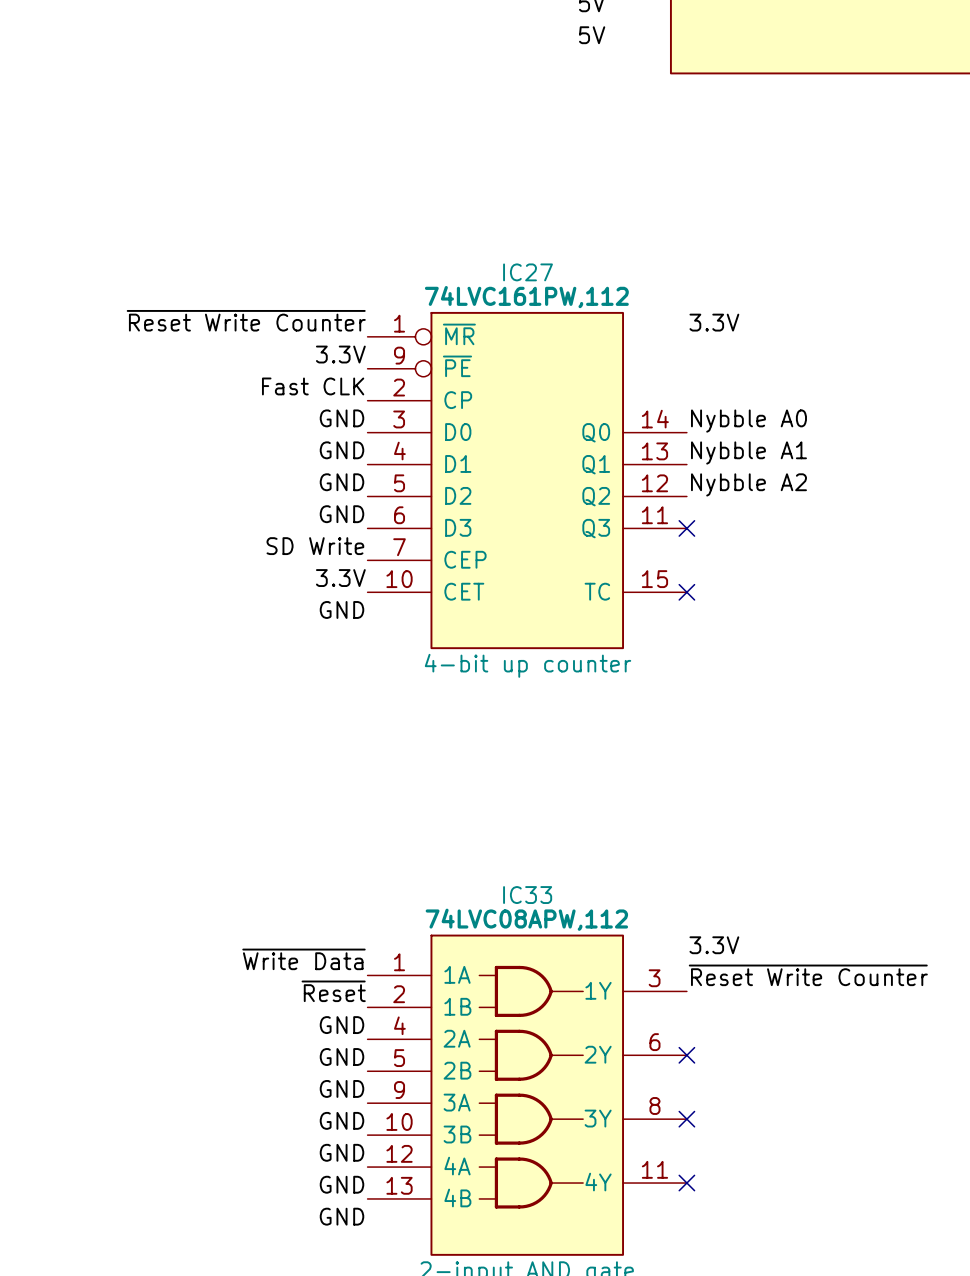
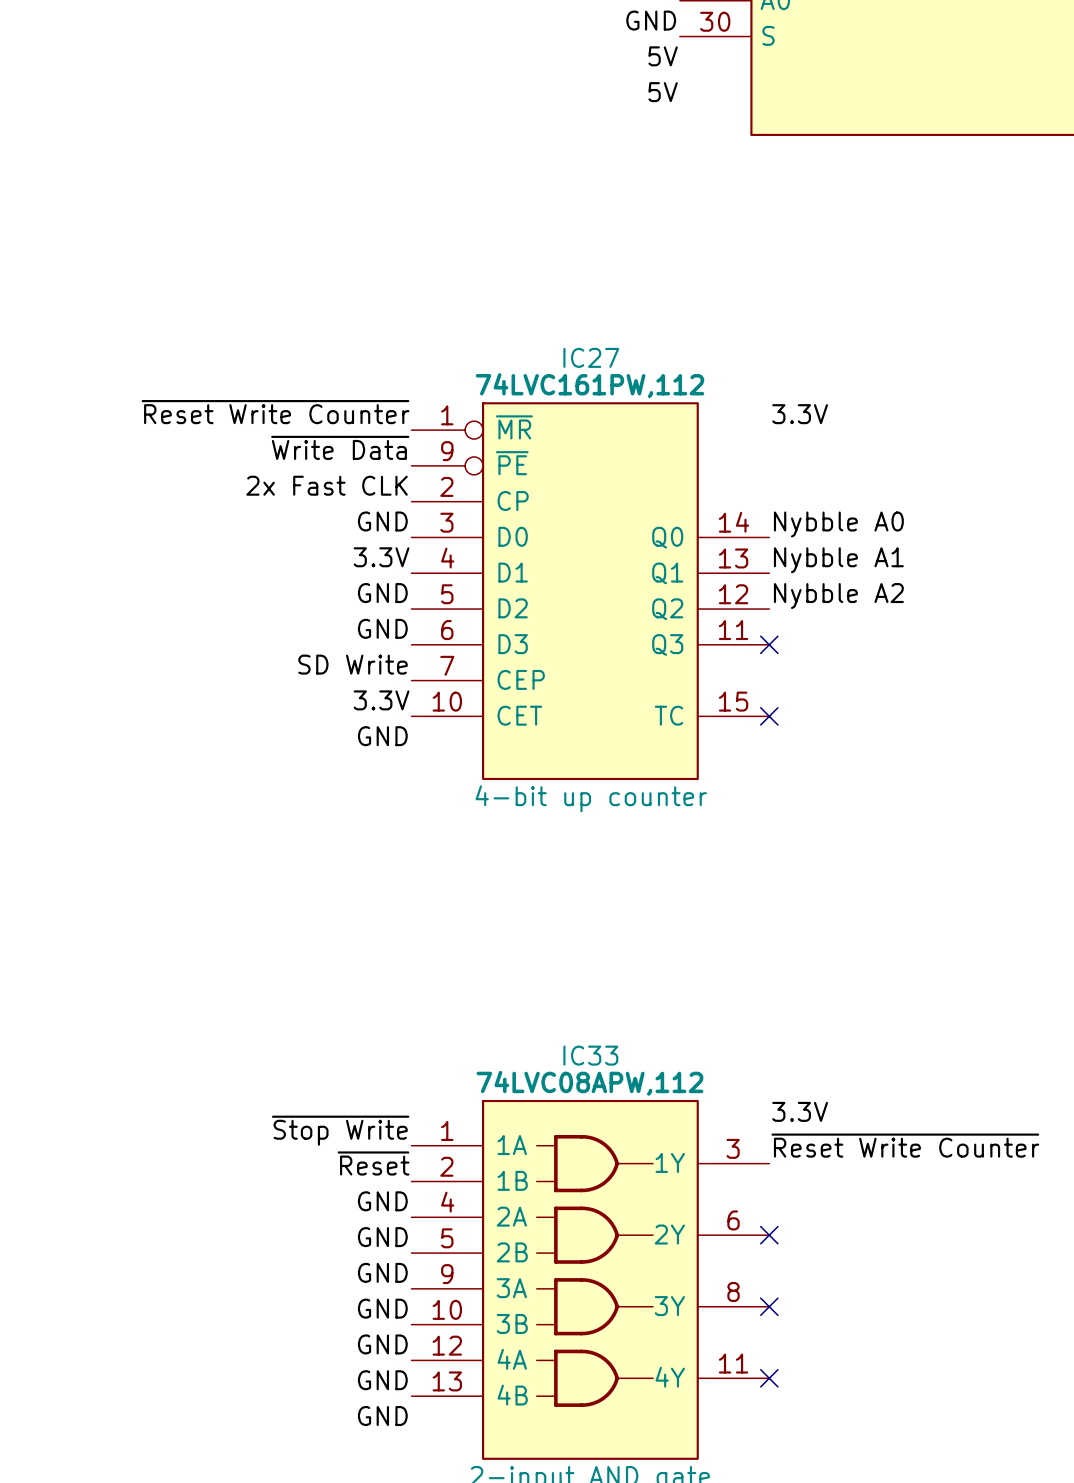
label: 3.3V (340, 354) -> ~{Write Data} (340, 447)
label: Fast CLK (313, 386) -> 2x Fast CLK (327, 485)
label: GND (342, 450) -> 3.3V (381, 557)
label: ~{Write Data} (303, 959) -> ~{Stop Write} (340, 1130)

